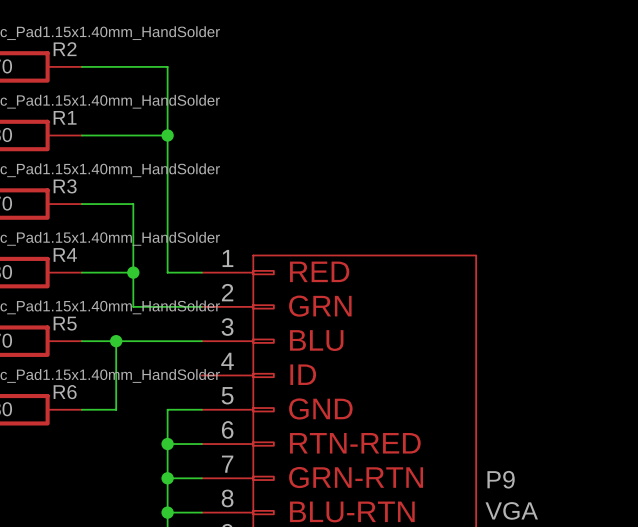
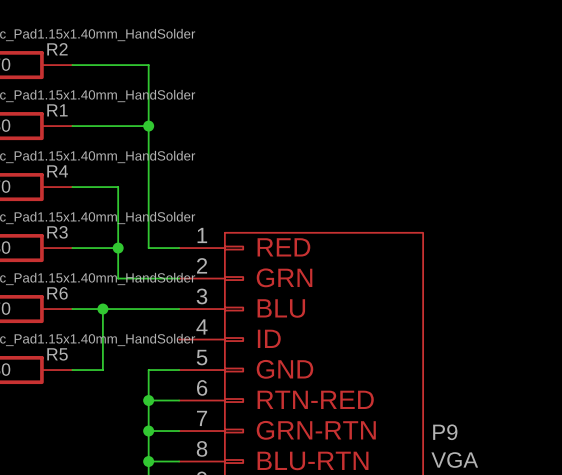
R3 name: R3 (65, 186) -> R4 (57, 171)
R4 name: R4 (65, 254) -> R3 (57, 232)
R5 name: R5 (65, 323) -> R6 (57, 293)
R6 name: R6 (65, 392) -> R5 (57, 354)

